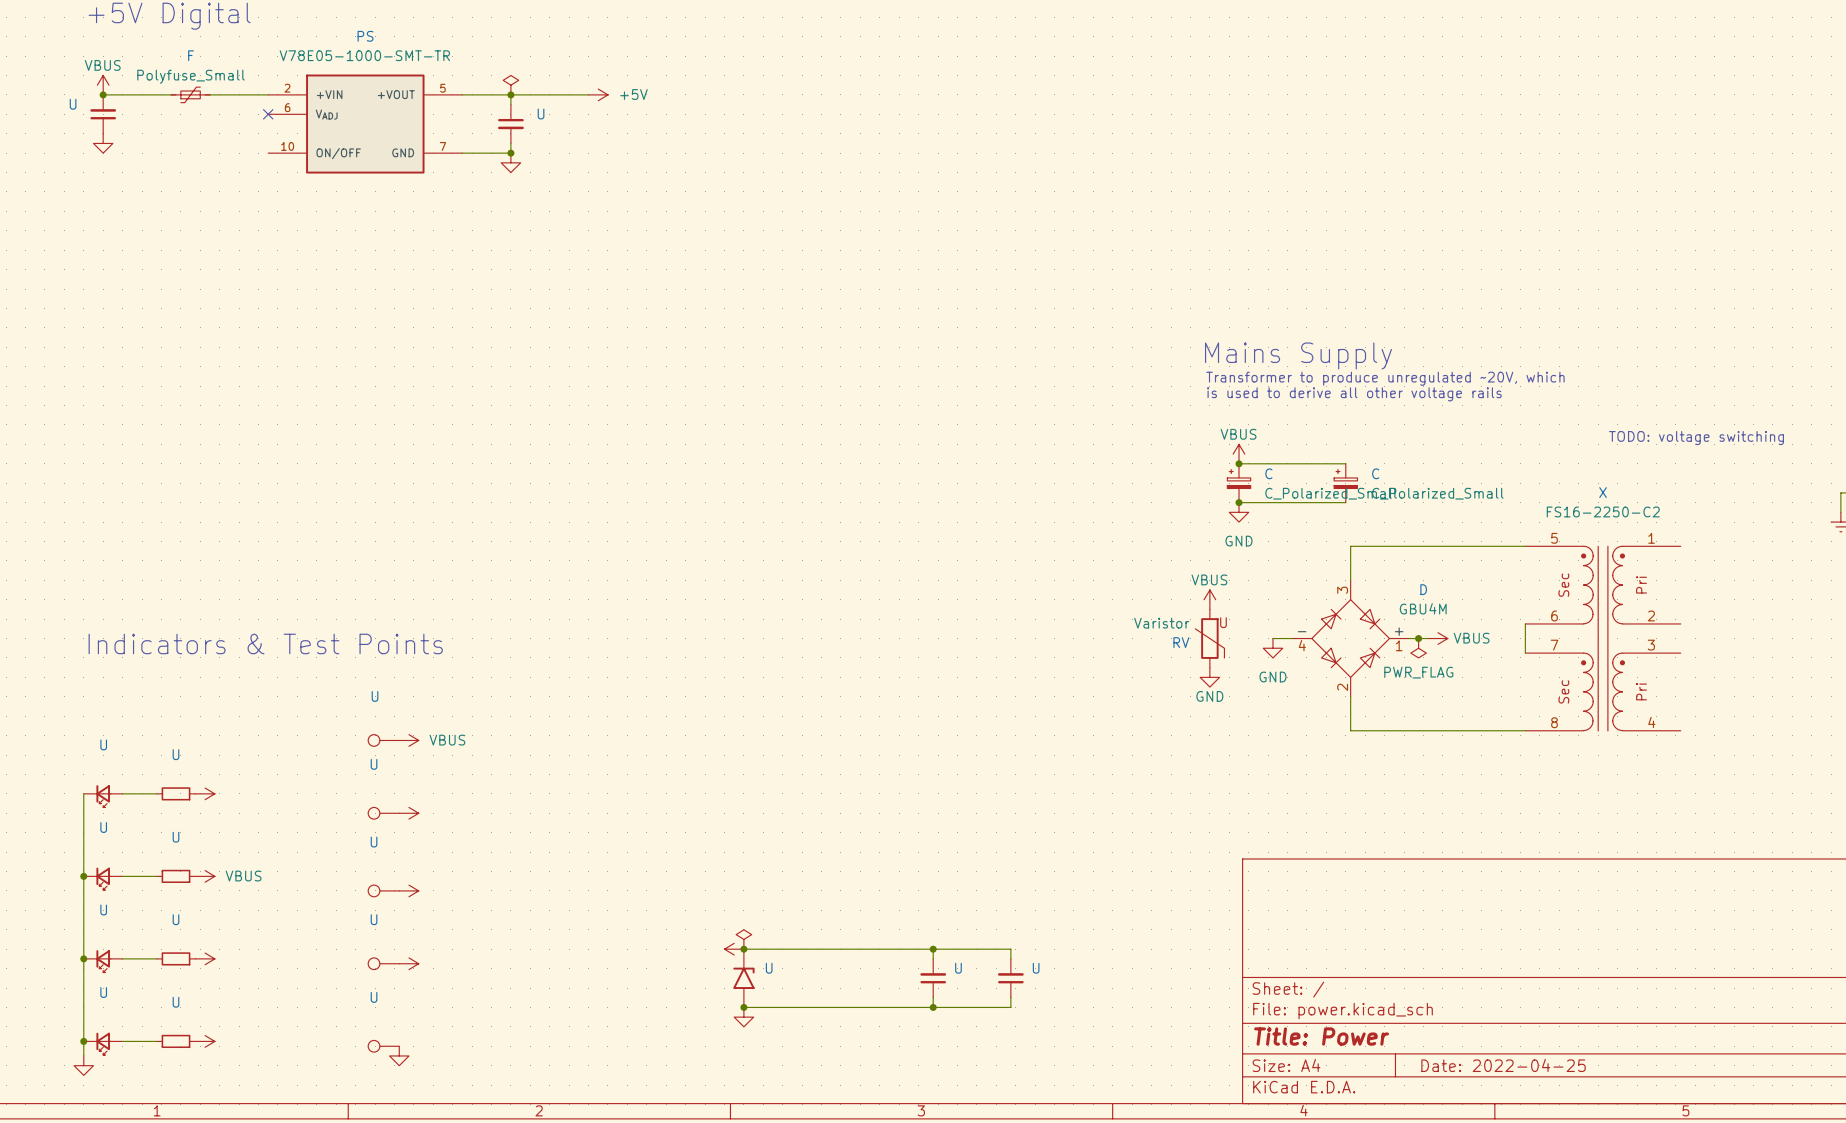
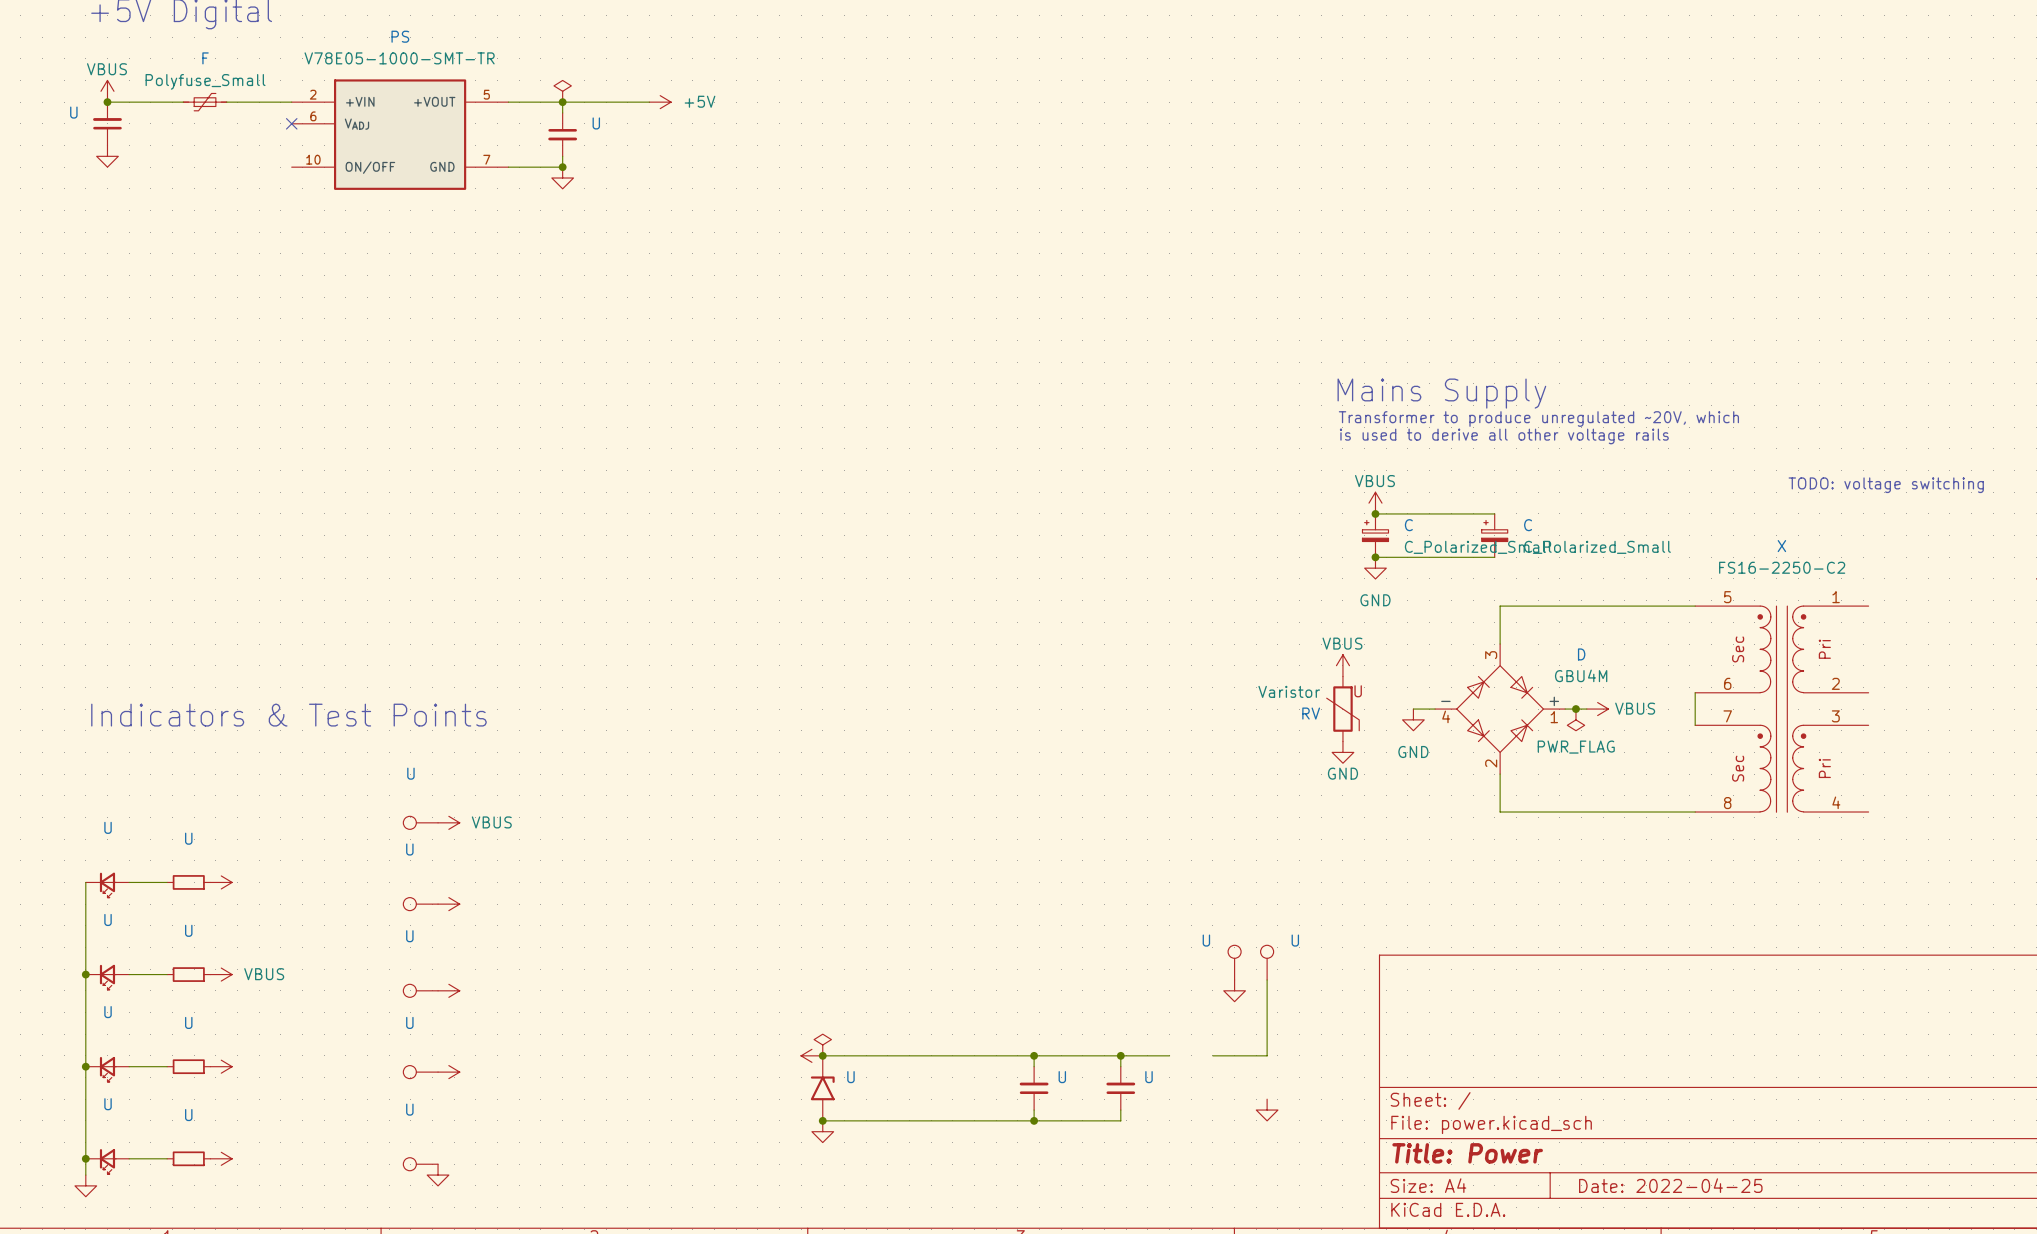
U: none -> (1234, 962)
U: none -> (1267, 962)
wire: none -> (1267, 979) (1267, 1055) (1212, 1055)
power symbol: none -> (1234, 990)
wire: none -> (1120, 1055) (1169, 1055)
junction: none -> (1120, 1055)
power symbol: none -> (1267, 1110)

